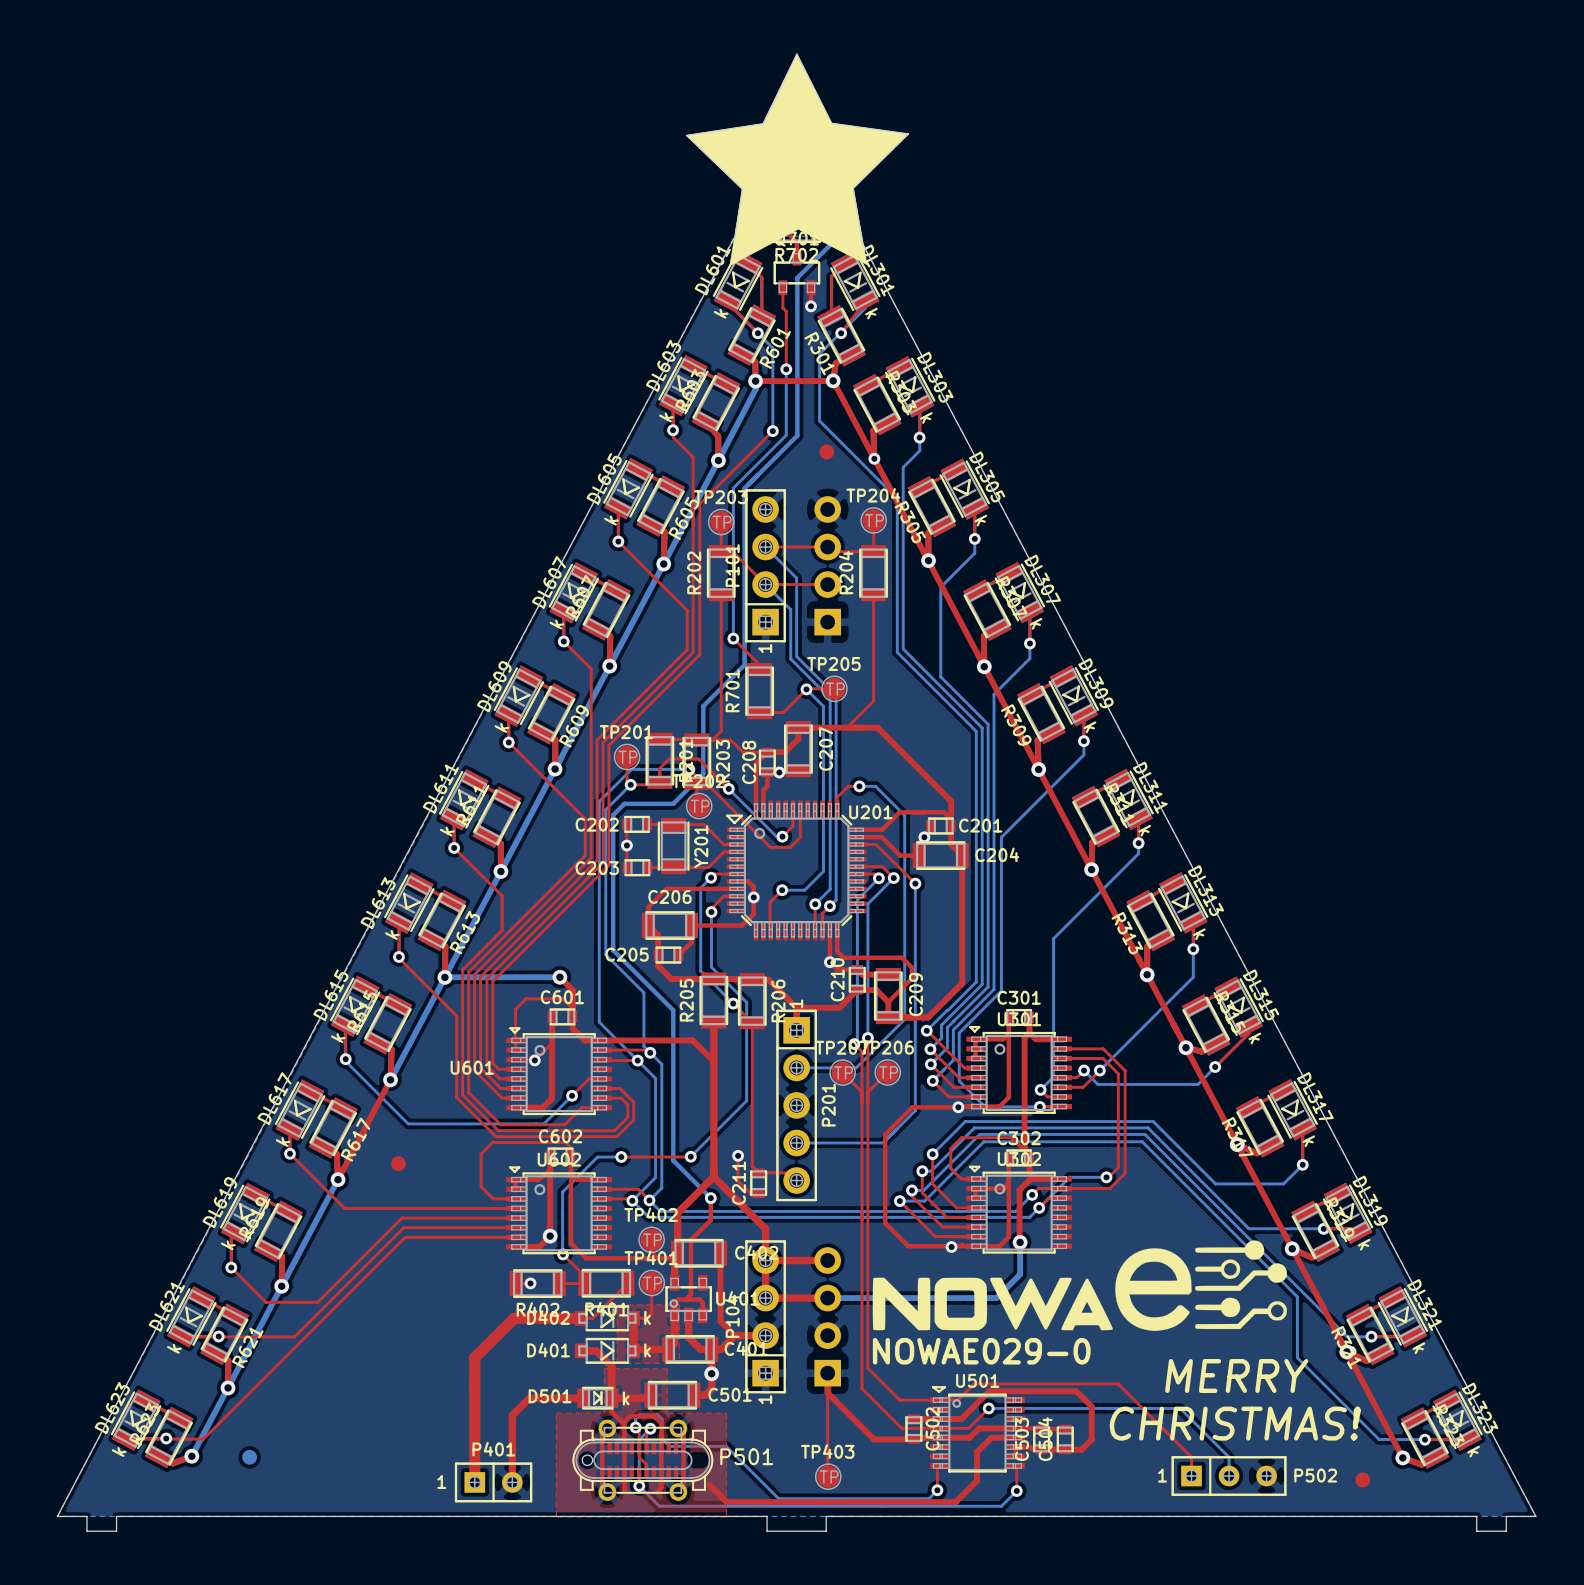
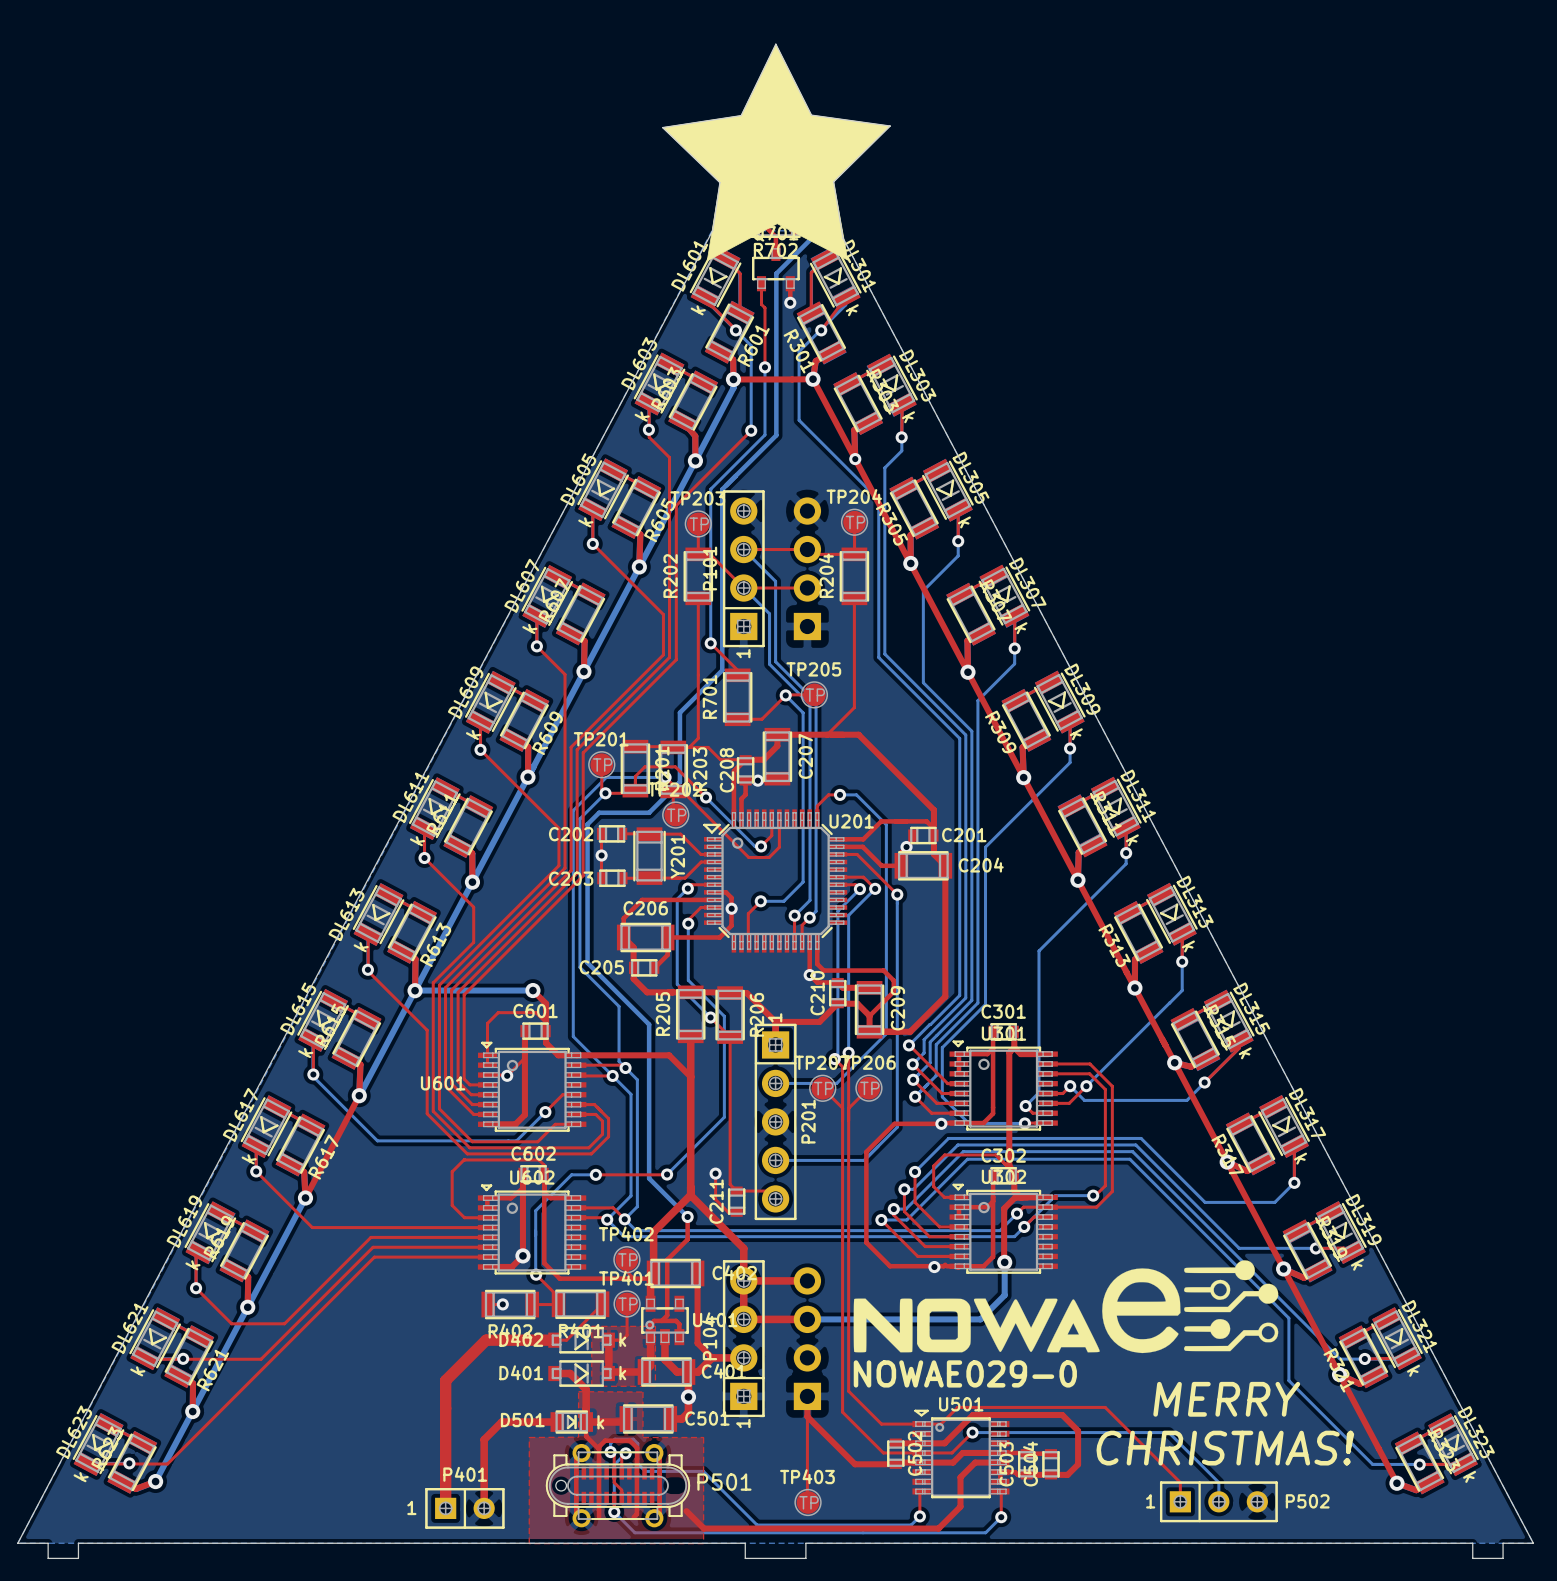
part: (826, 451) -> none
part: (398, 1163) -> none
part: (249, 1457) -> none
part: (1362, 1479) -> none

